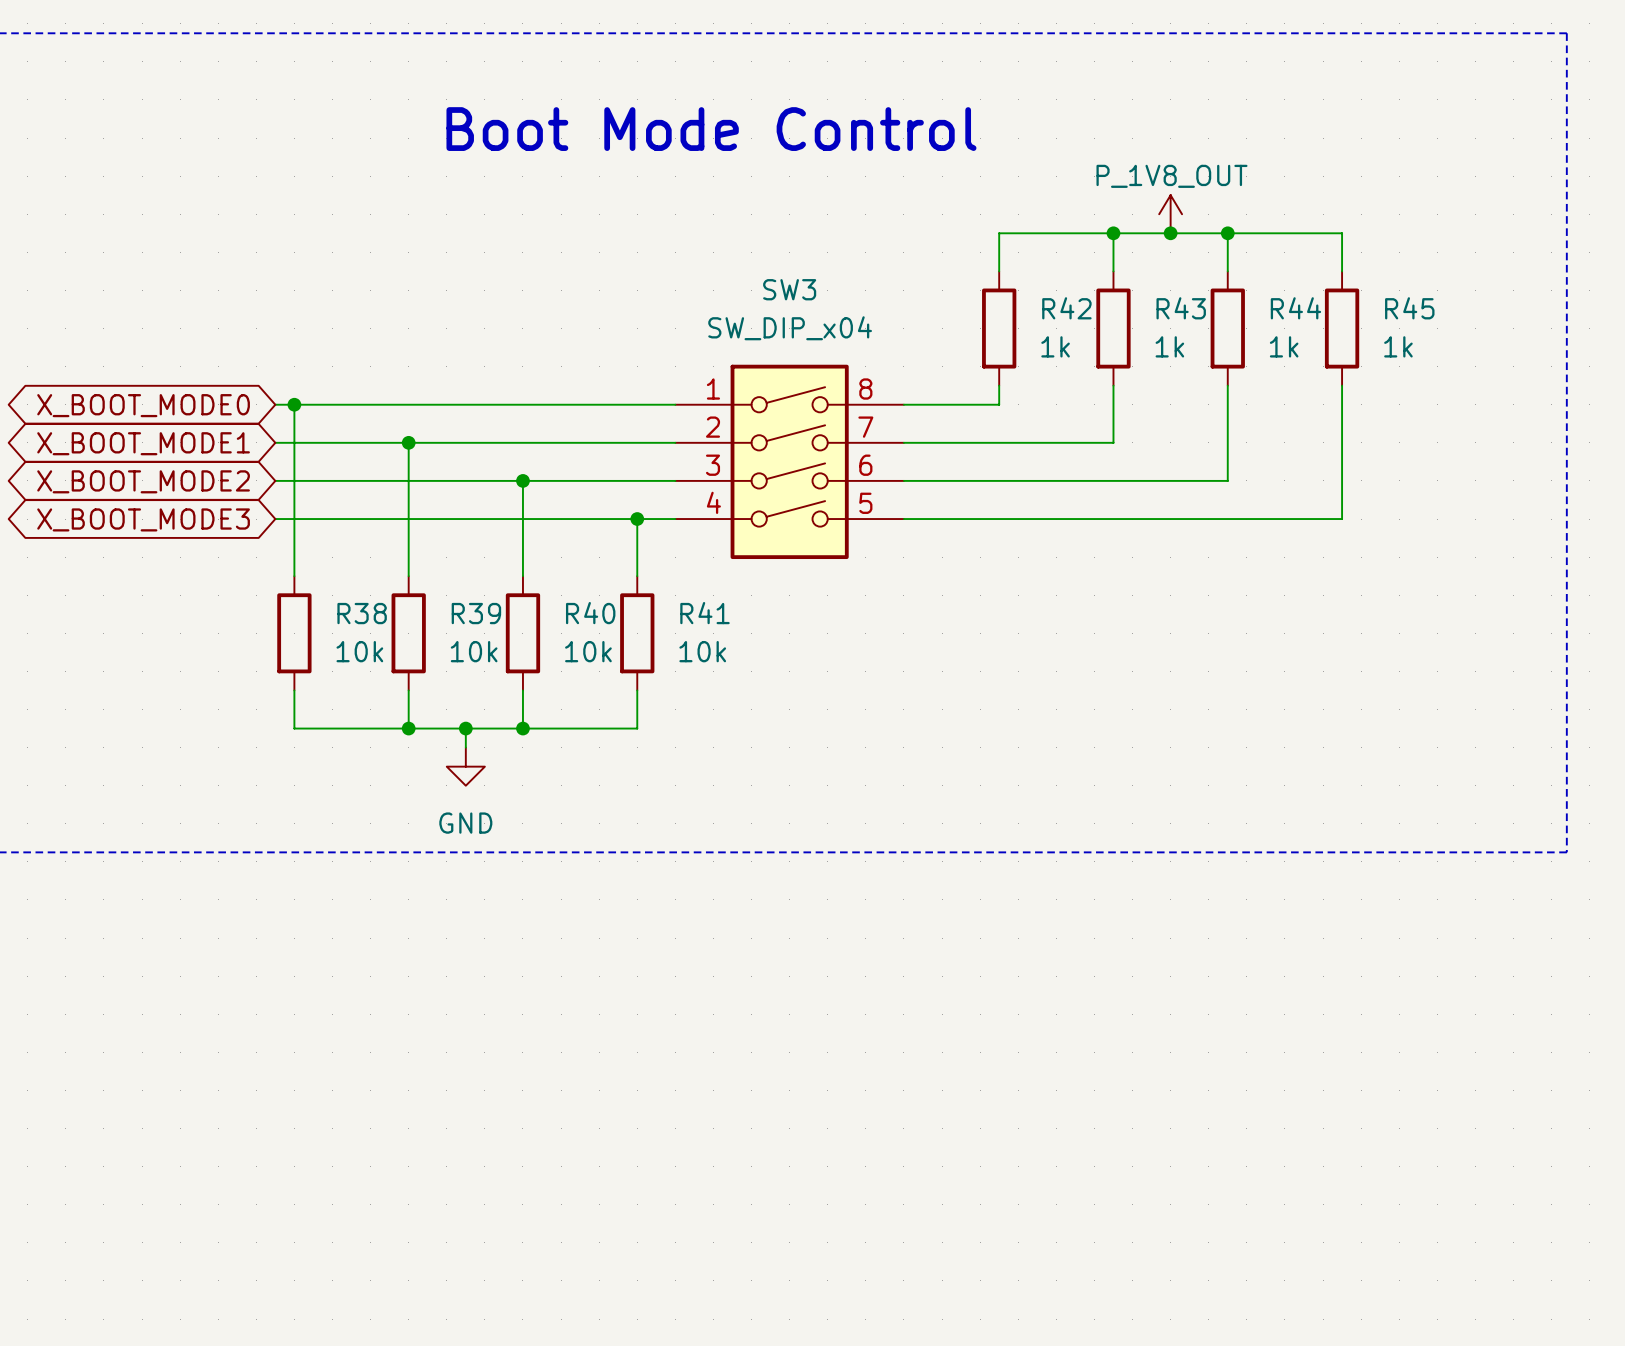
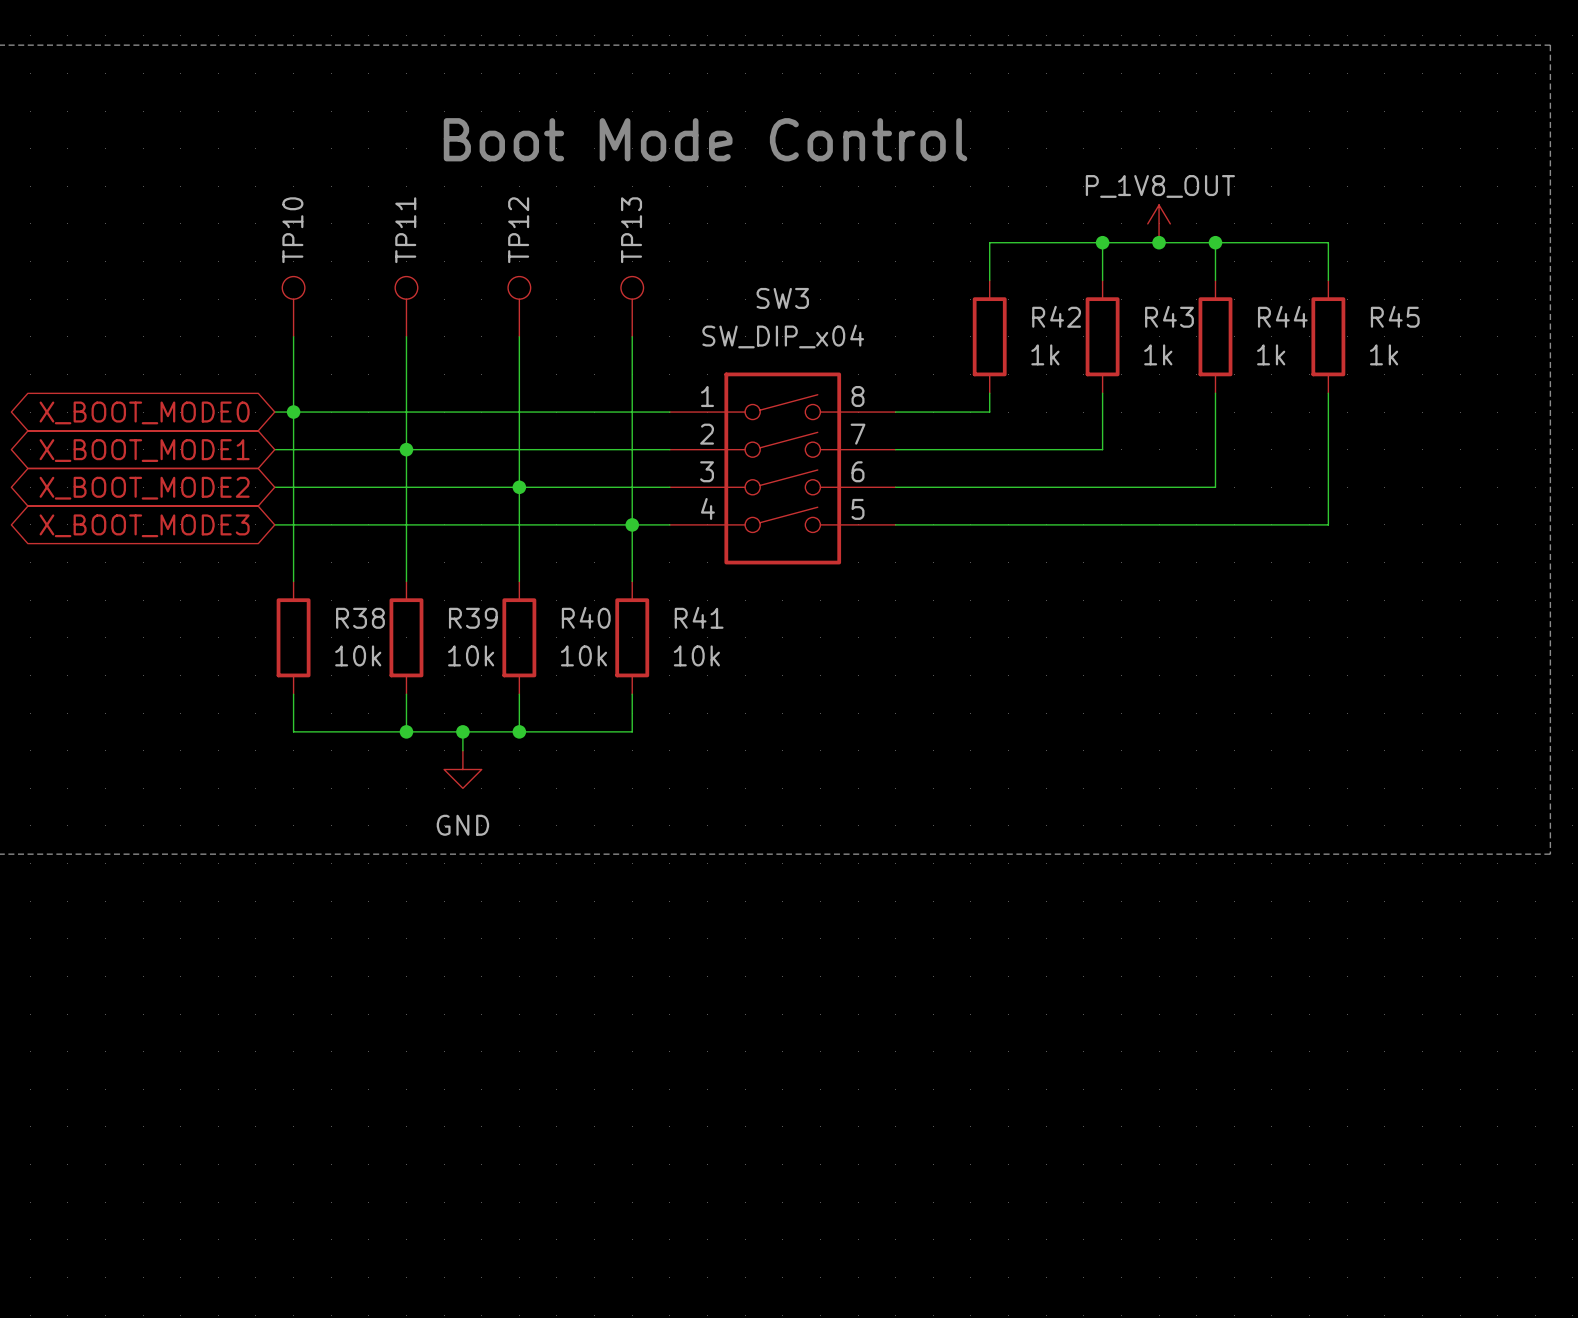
TP10: none -> (293, 306)
TP11: none -> (406, 306)
TP12: none -> (519, 306)
TP13: none -> (632, 306)
wire: none -> (293, 336) (293, 412)
wire: none -> (406, 336) (406, 449)
wire: none -> (519, 336) (519, 487)
wire: none -> (632, 336) (632, 524)

